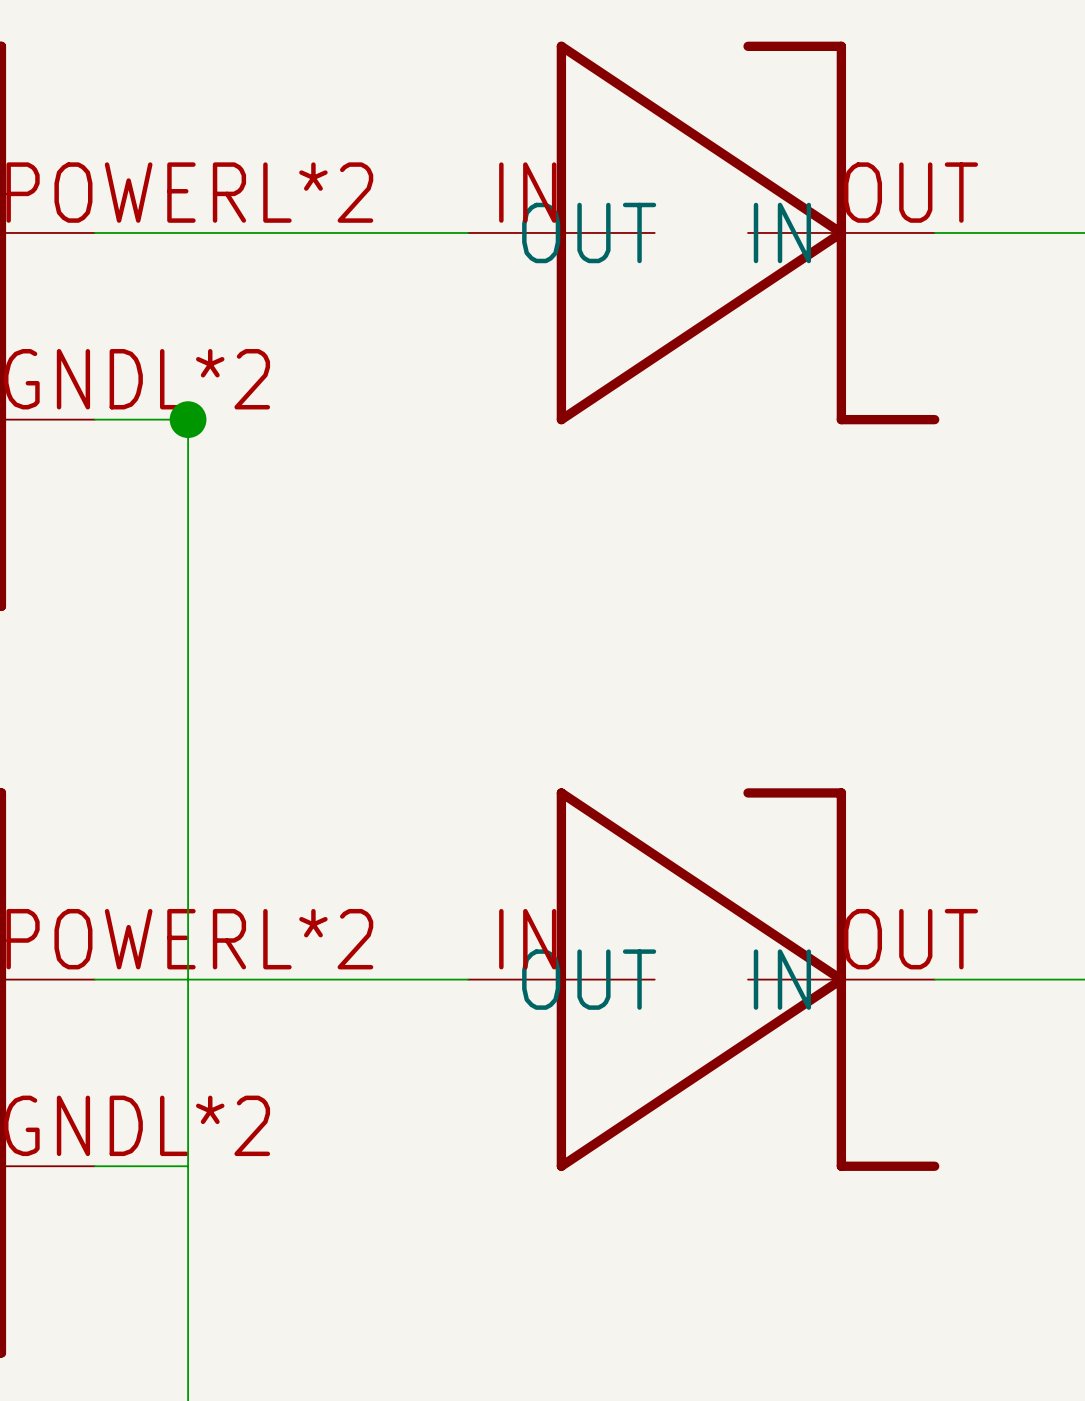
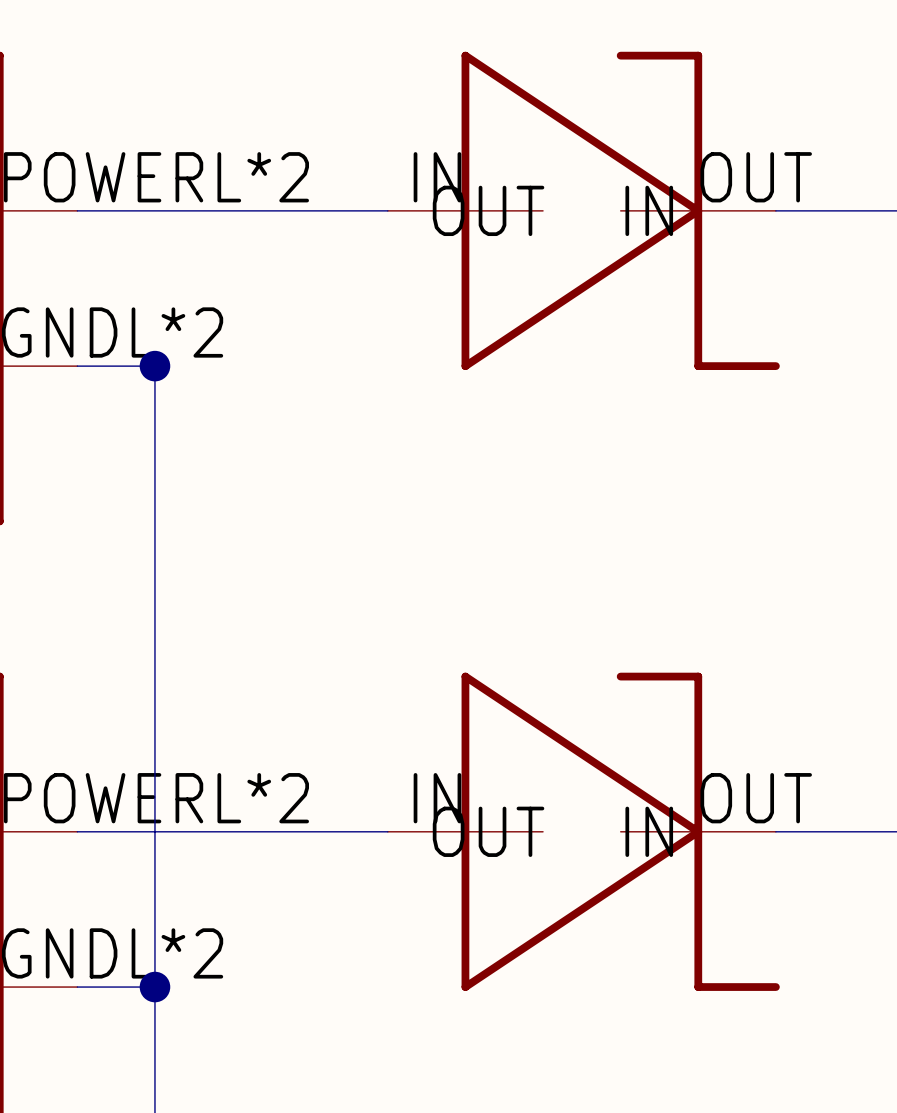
junction: none -> (154, 987)

